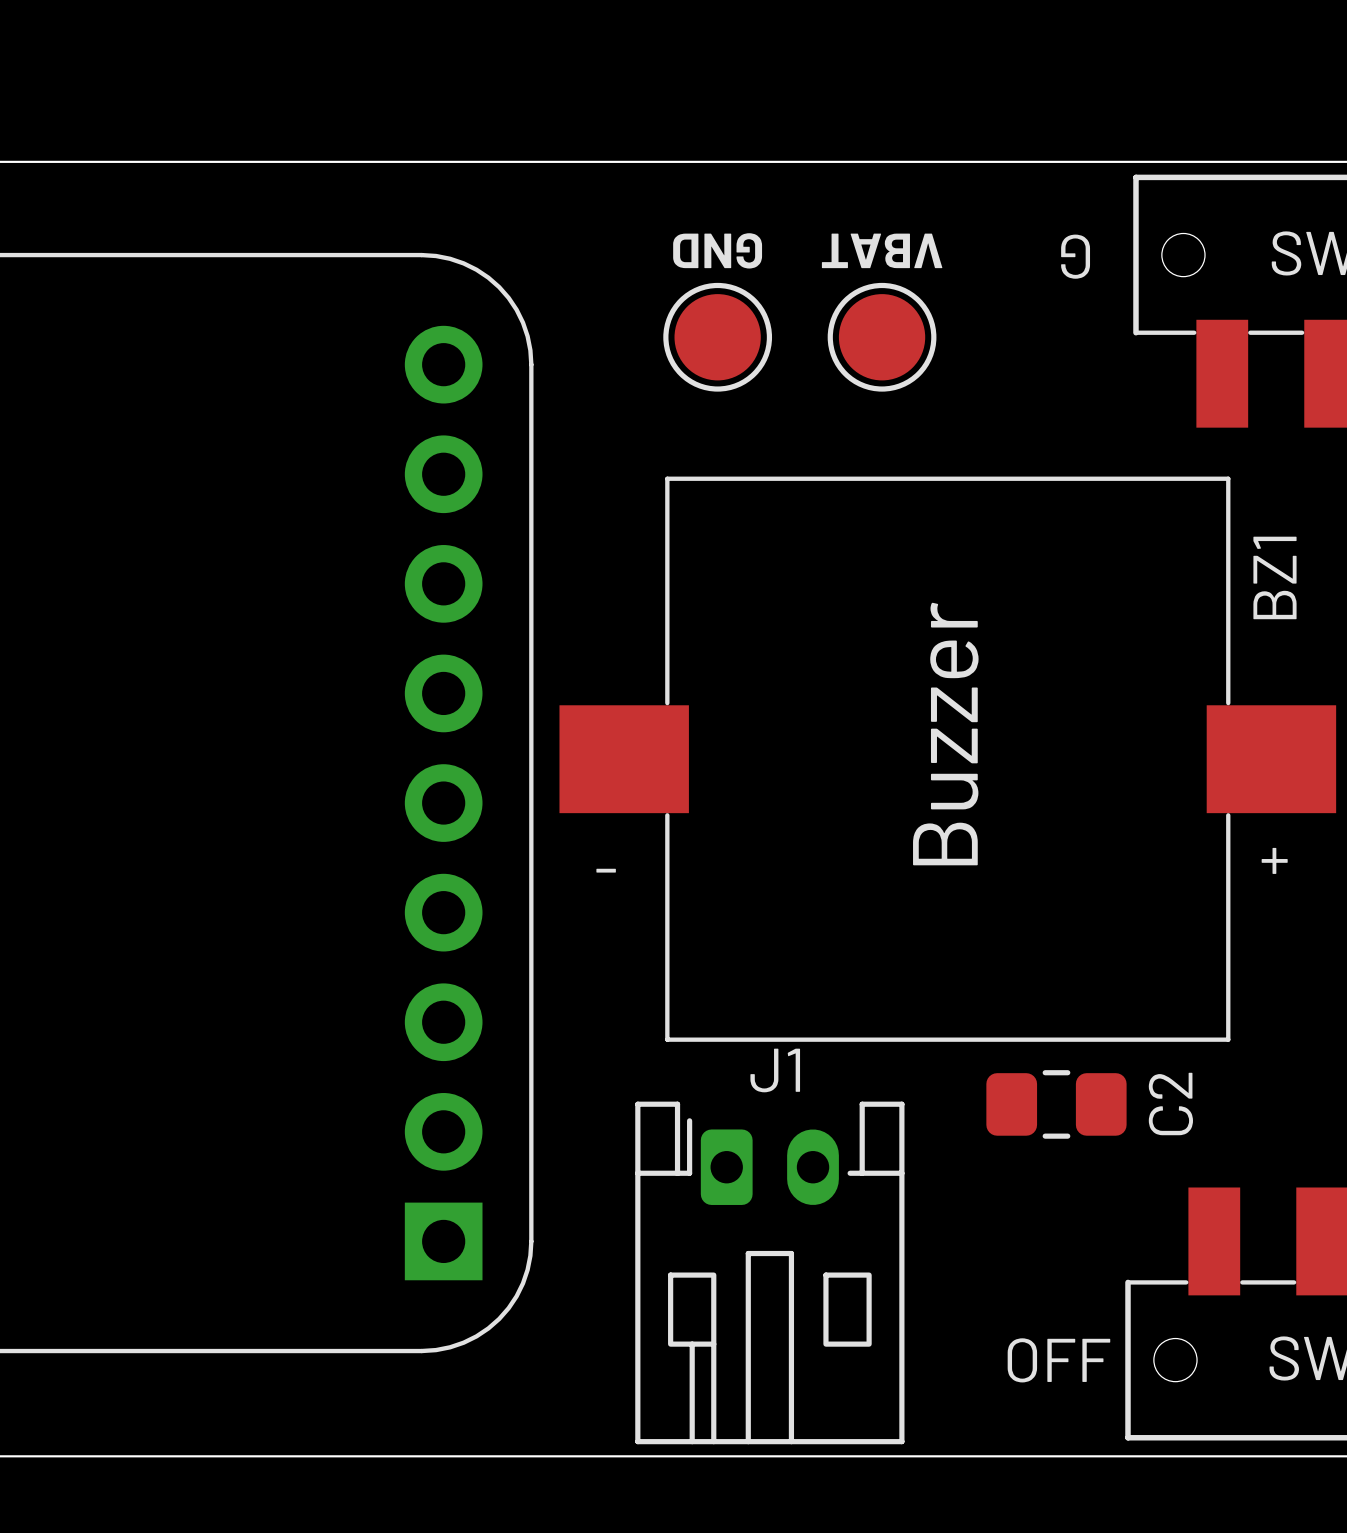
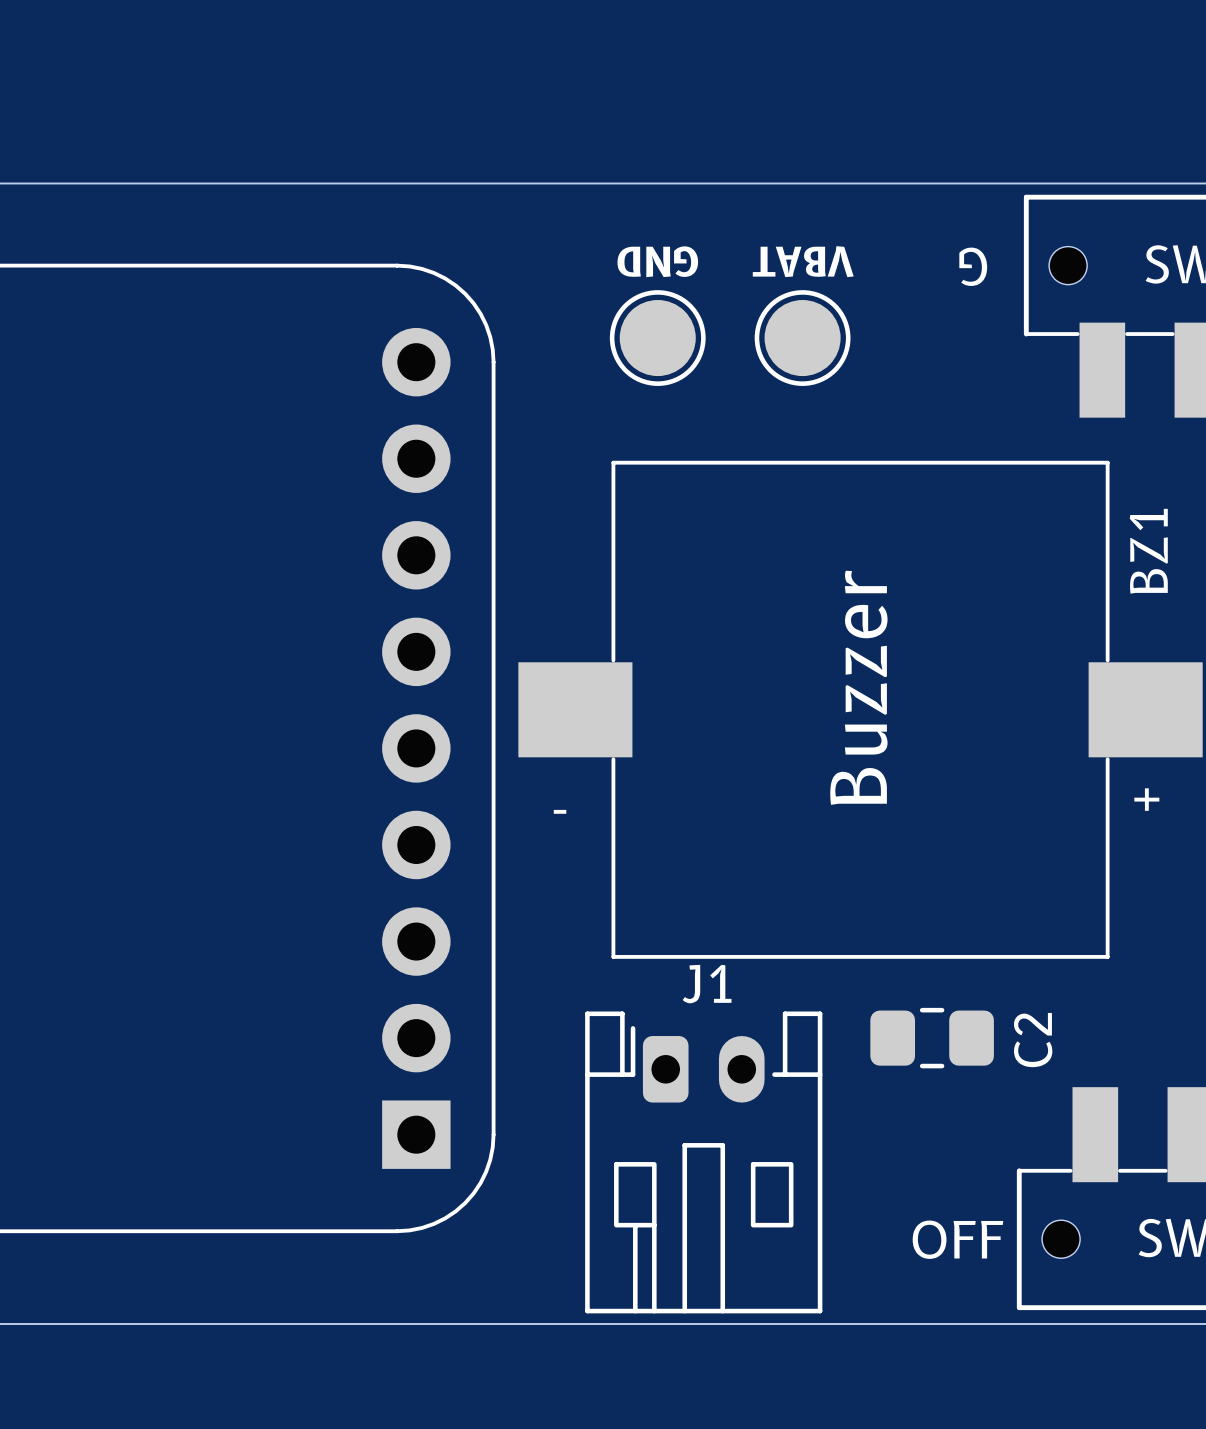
C2 position: (1056, 1104) -> (932, 1038)

